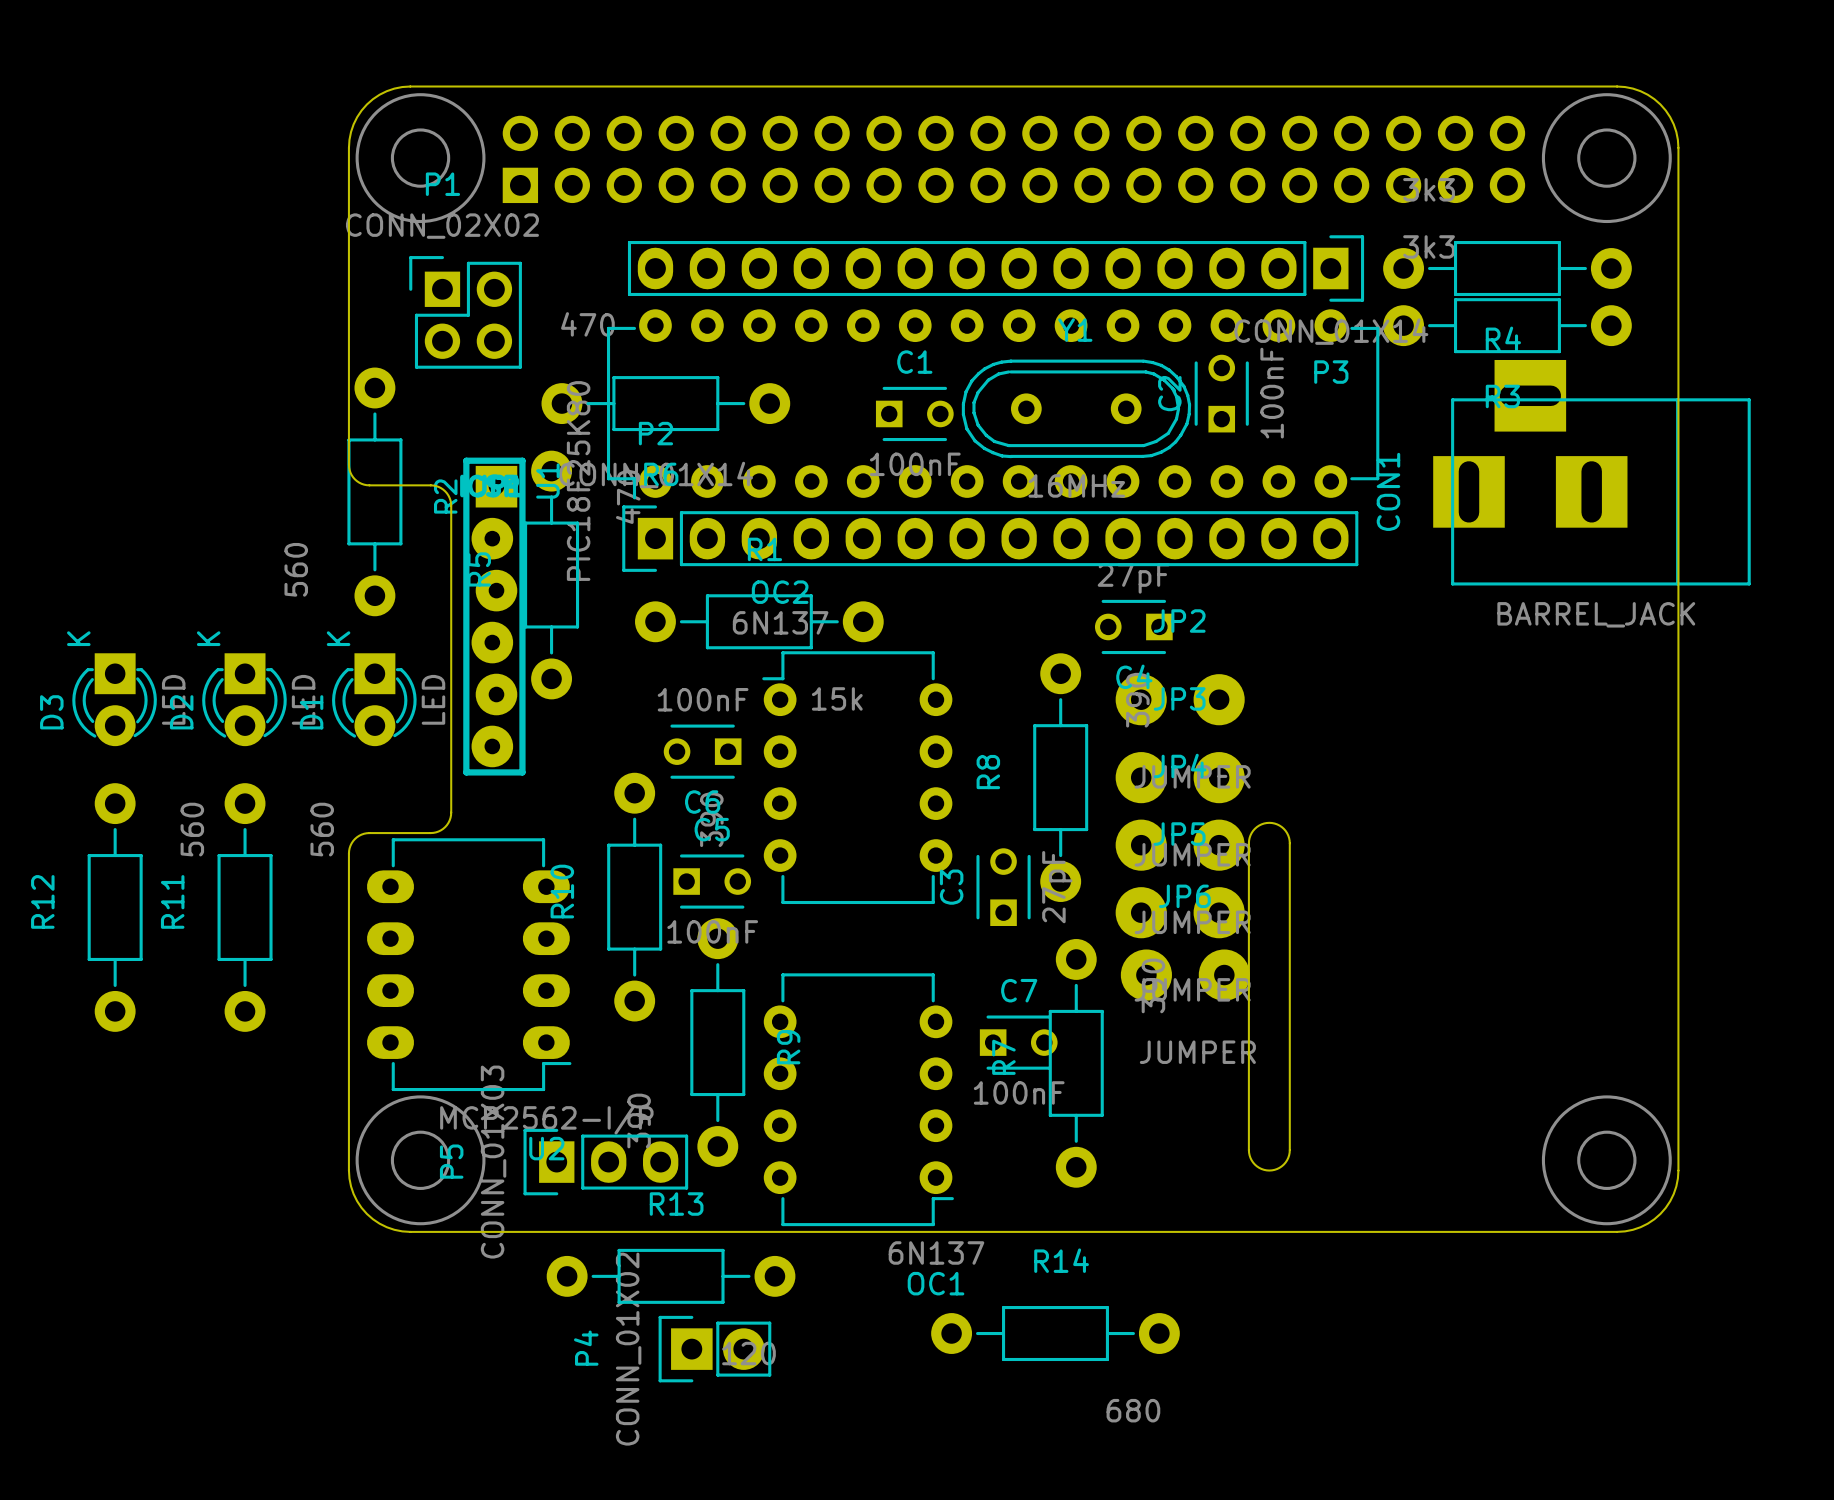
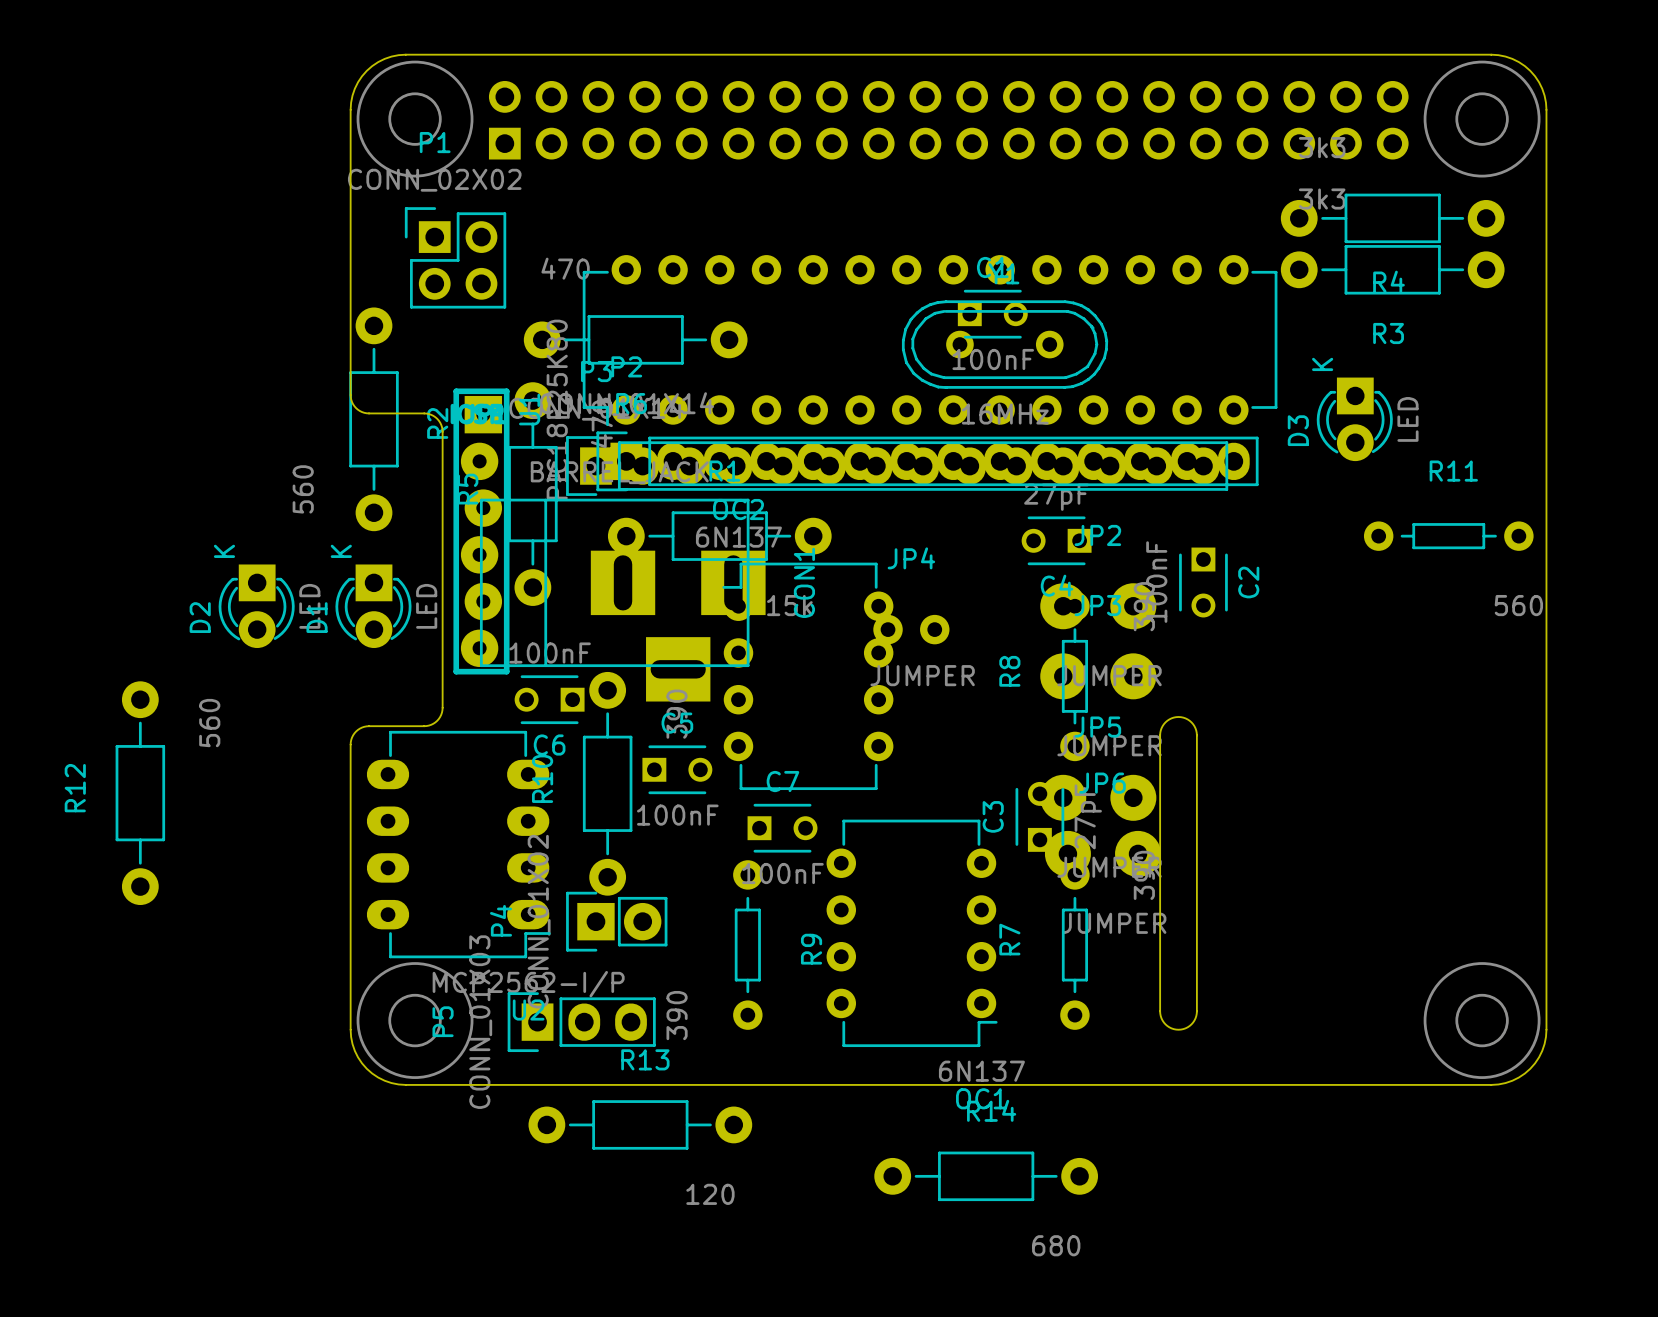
P3 rotation: 0° (996, 268) -> 180° (897, 466)
C2 rotation: 0° (1221, 393) -> 180° (1203, 582)
C2 position: (1221, 393) -> (1203, 582)
C1 position: (914, 413) -> (992, 314)
CON1 rotation: 0° (1591, 472) -> 180° (622, 600)
CON1 position: (1591, 472) -> (622, 600)
R8 footprint: [1033, 653, 1089, 902] -> [1060, 591, 1090, 762]
D3 position: (114, 699) -> (1354, 419)
C6 position: (702, 751) -> (549, 699)
R11 footprint: [217, 783, 273, 1032] -> [1363, 521, 1534, 551]
JP4 footprint: [1115, 819, 1245, 871] -> [873, 614, 950, 645]
R11 value position: 560 (322, 829) -> 560 (1518, 605)
C3 position: (1003, 887) -> (1039, 816)
R11 name position: R11 (172, 901) -> R11 (1453, 471)
R9 footprint: [690, 918, 746, 1167] -> [733, 860, 763, 1030]
R7 footprint: [1048, 939, 1104, 1188] -> [1060, 860, 1090, 1030]
C7 position: (1018, 1042) -> (782, 828)
OC1 position: (858, 1099) -> (912, 933)
P4 position: (714, 1349) -> (616, 921)

